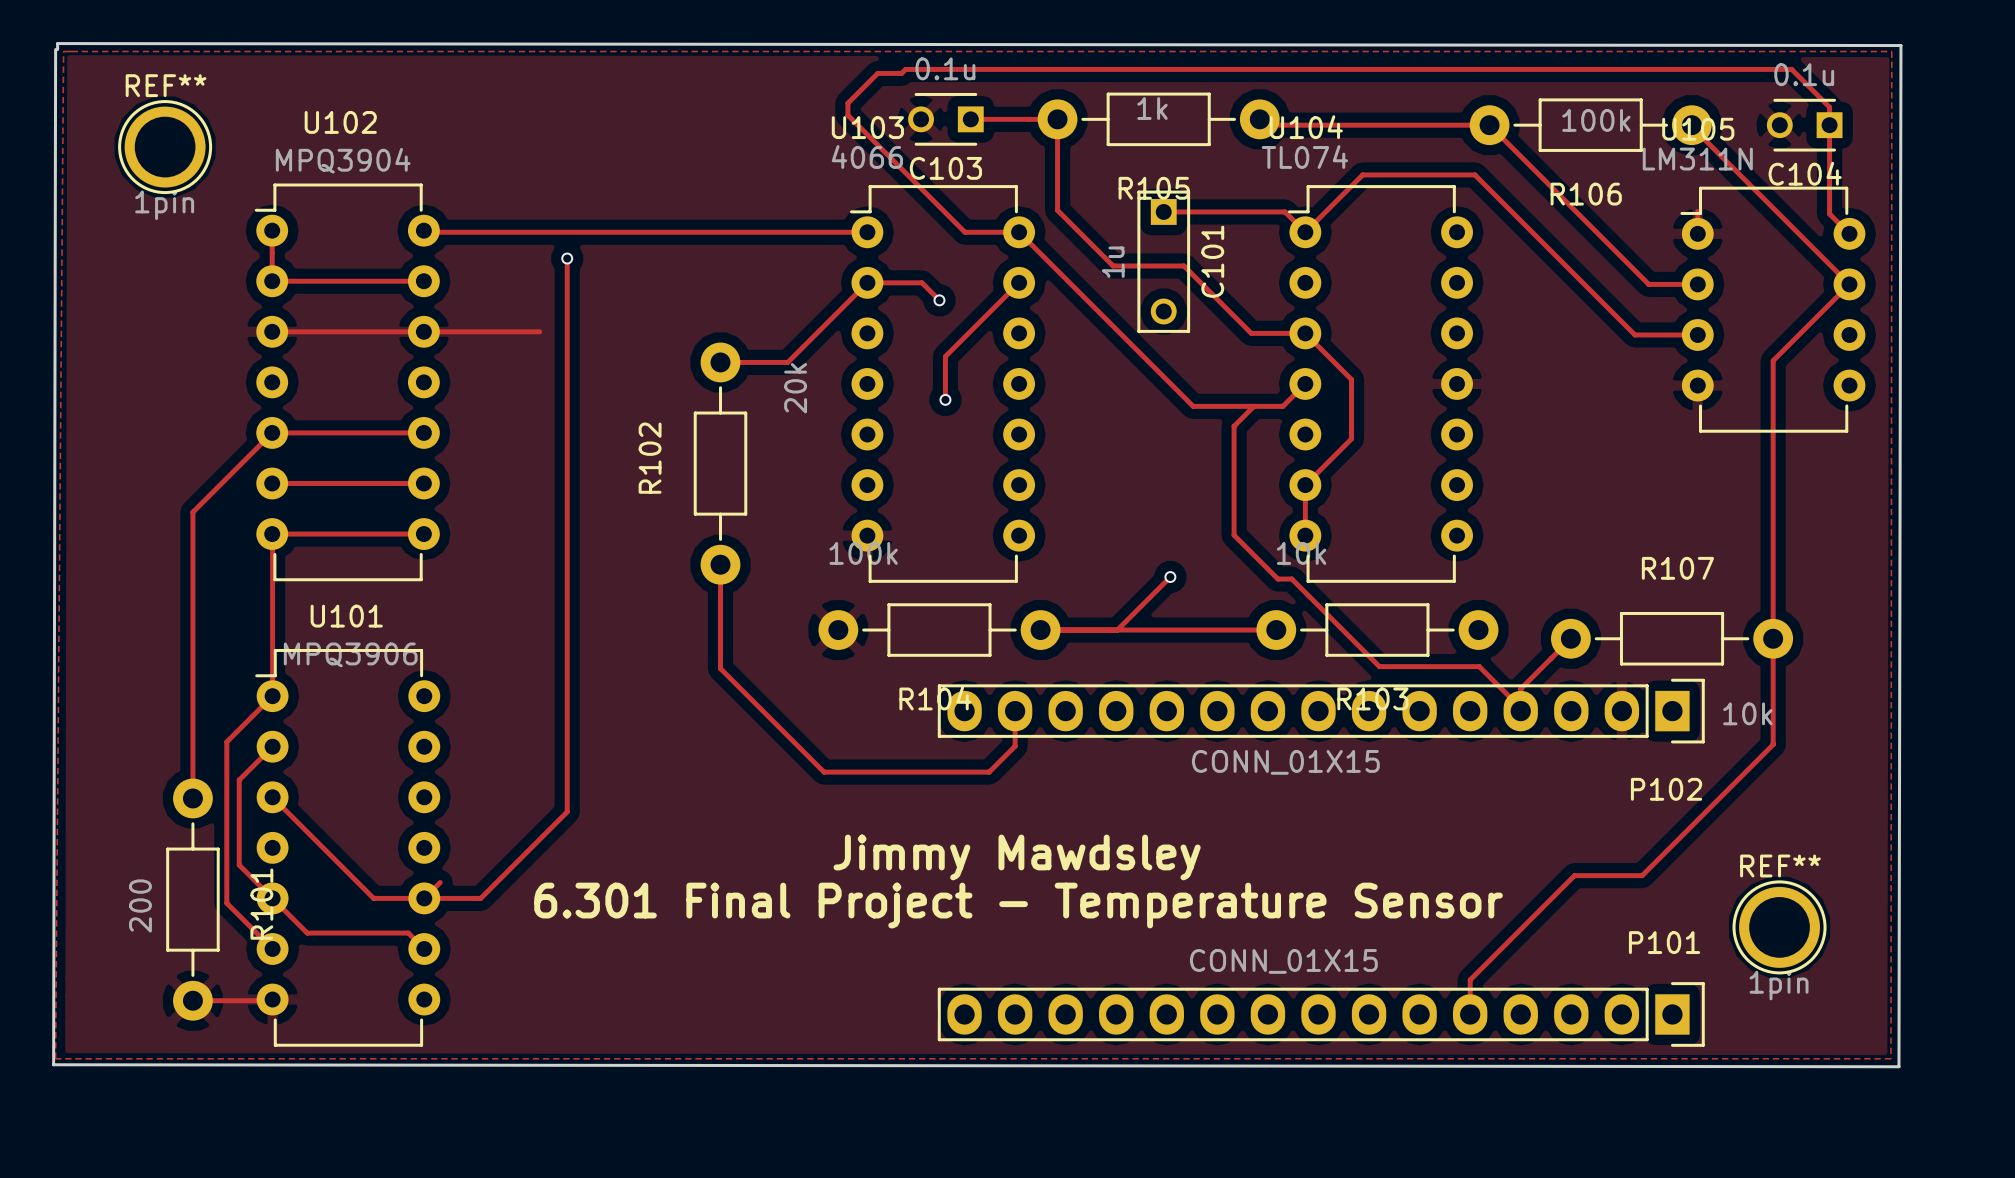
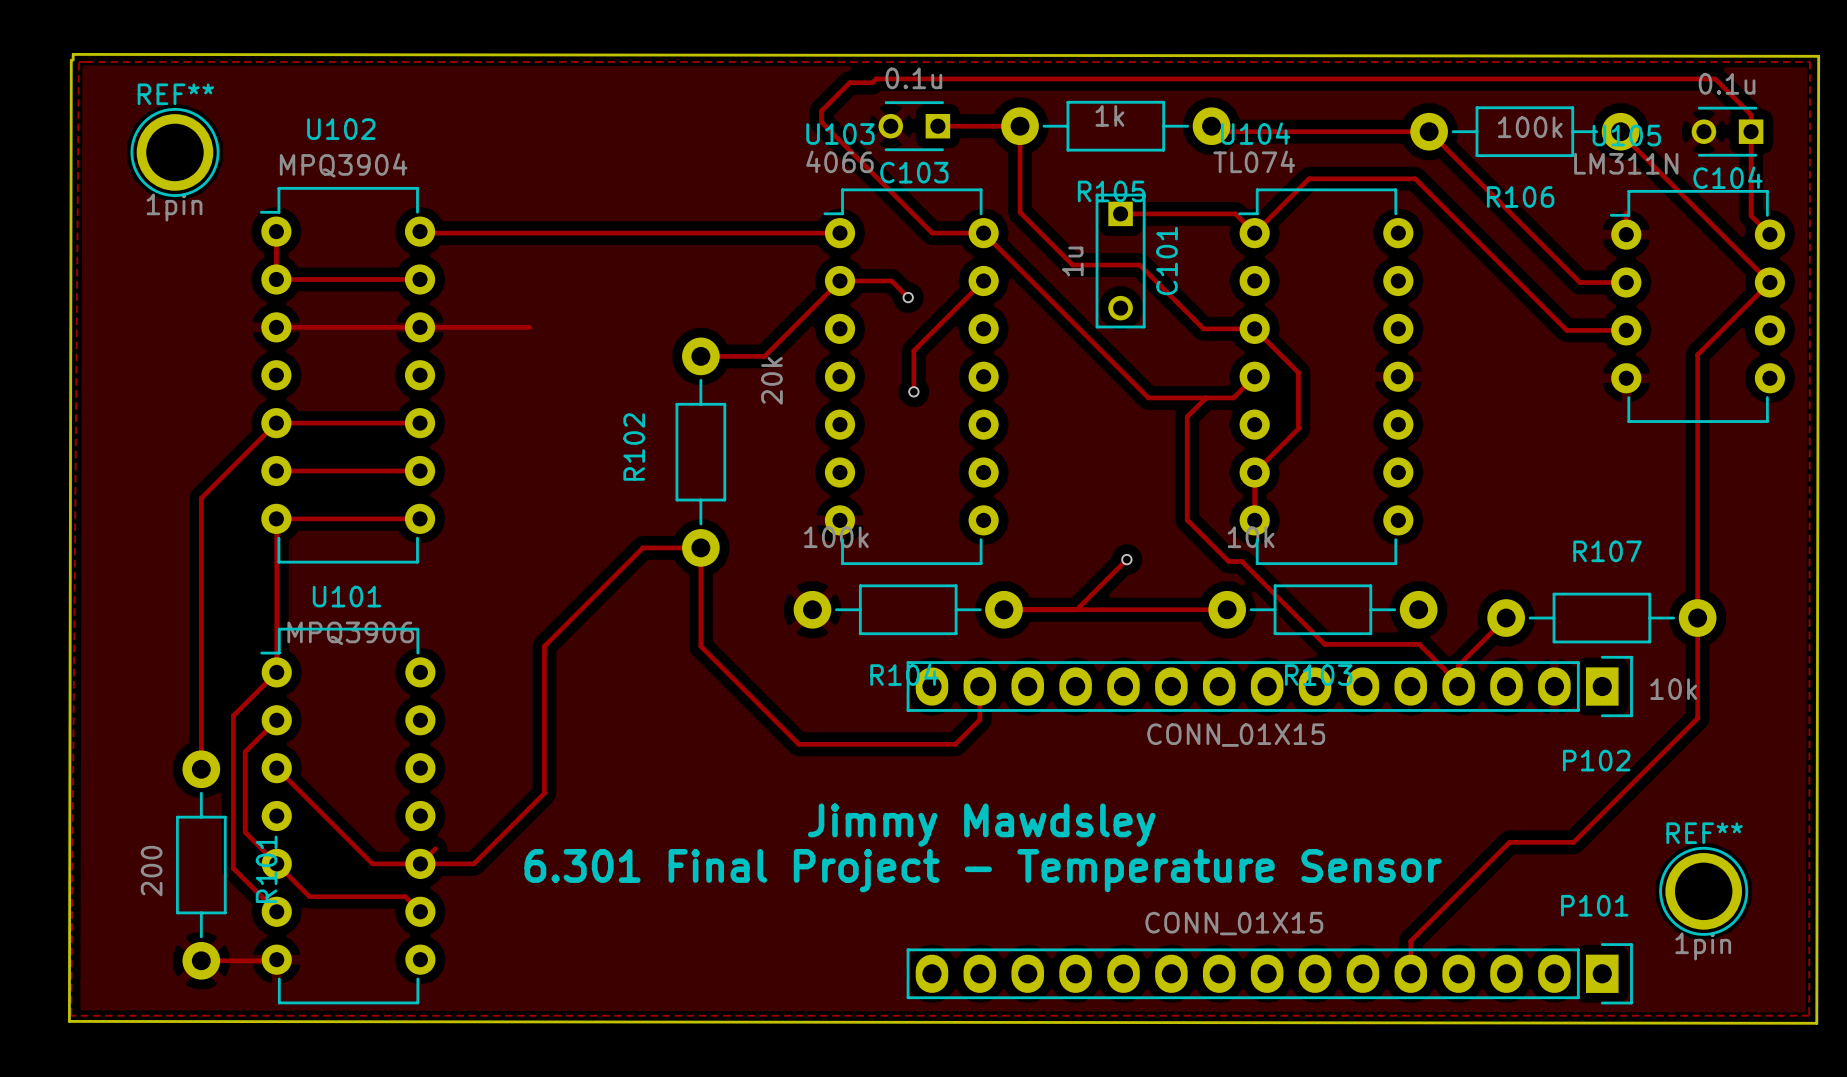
track: (567, 258) (567, 811) (555, 823) -> (700, 547) (642, 547) (544, 646) (544, 793)
via: (567, 258) -> none

